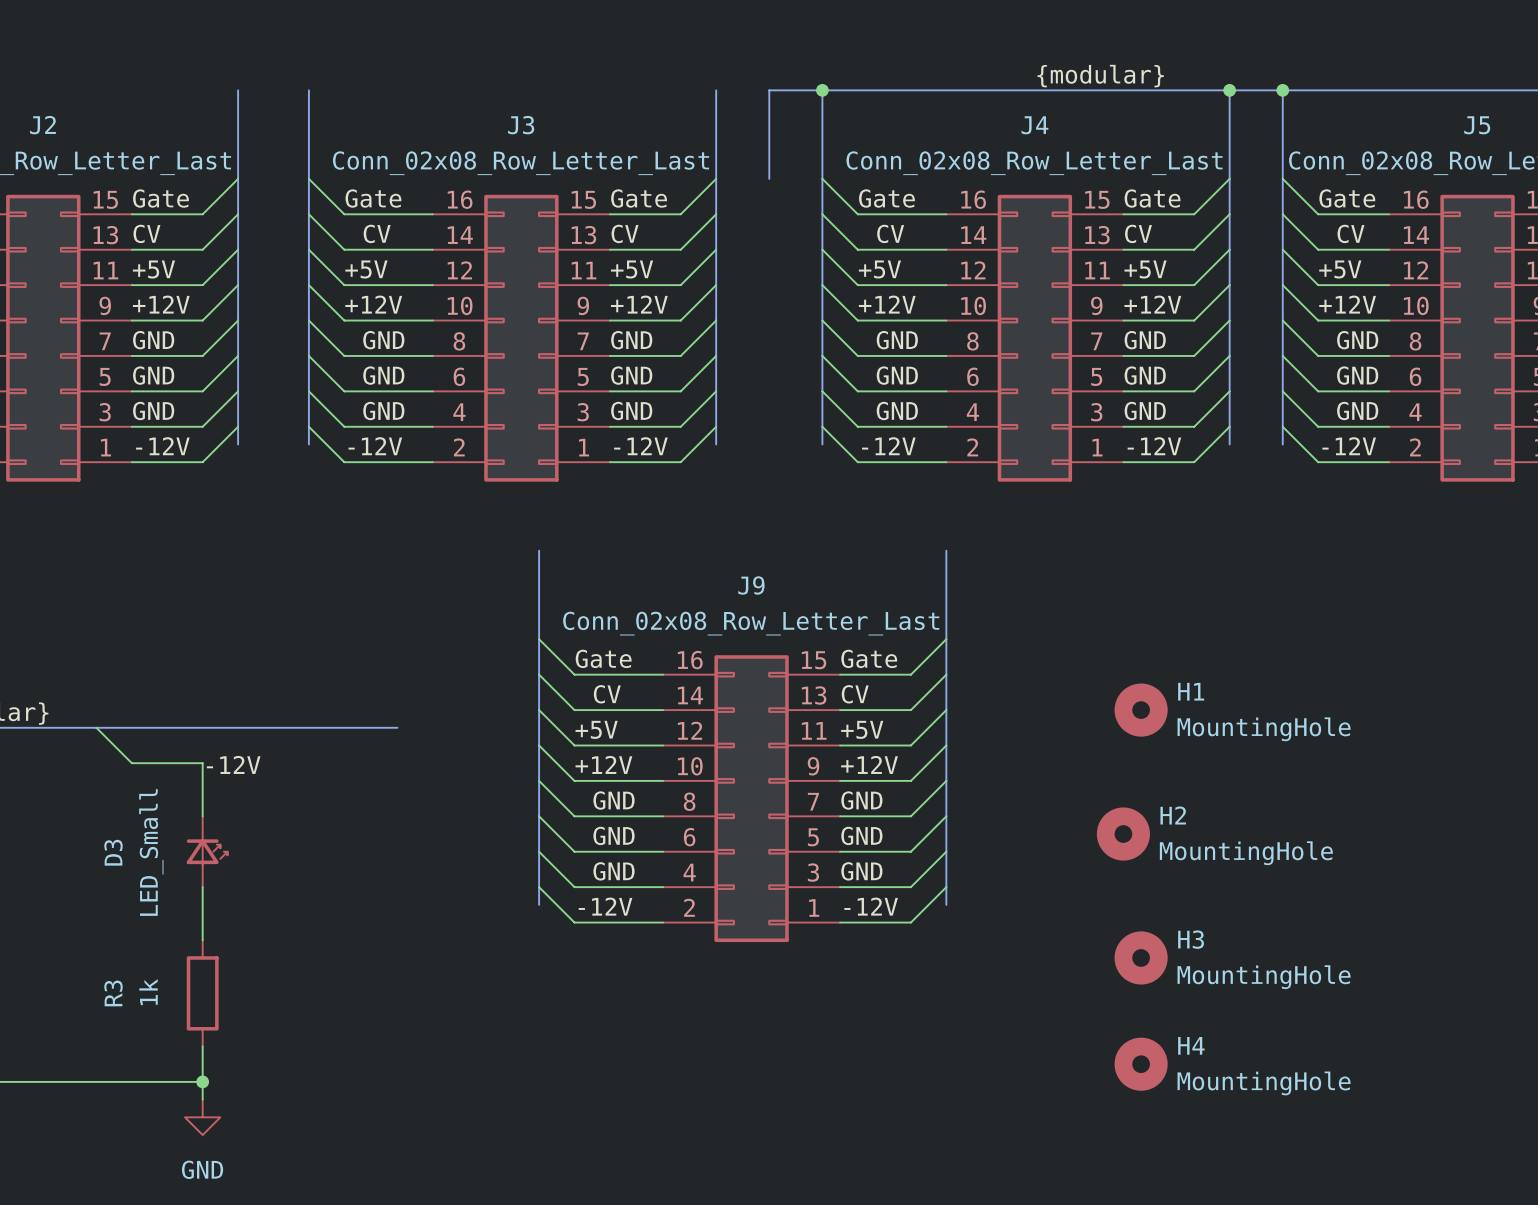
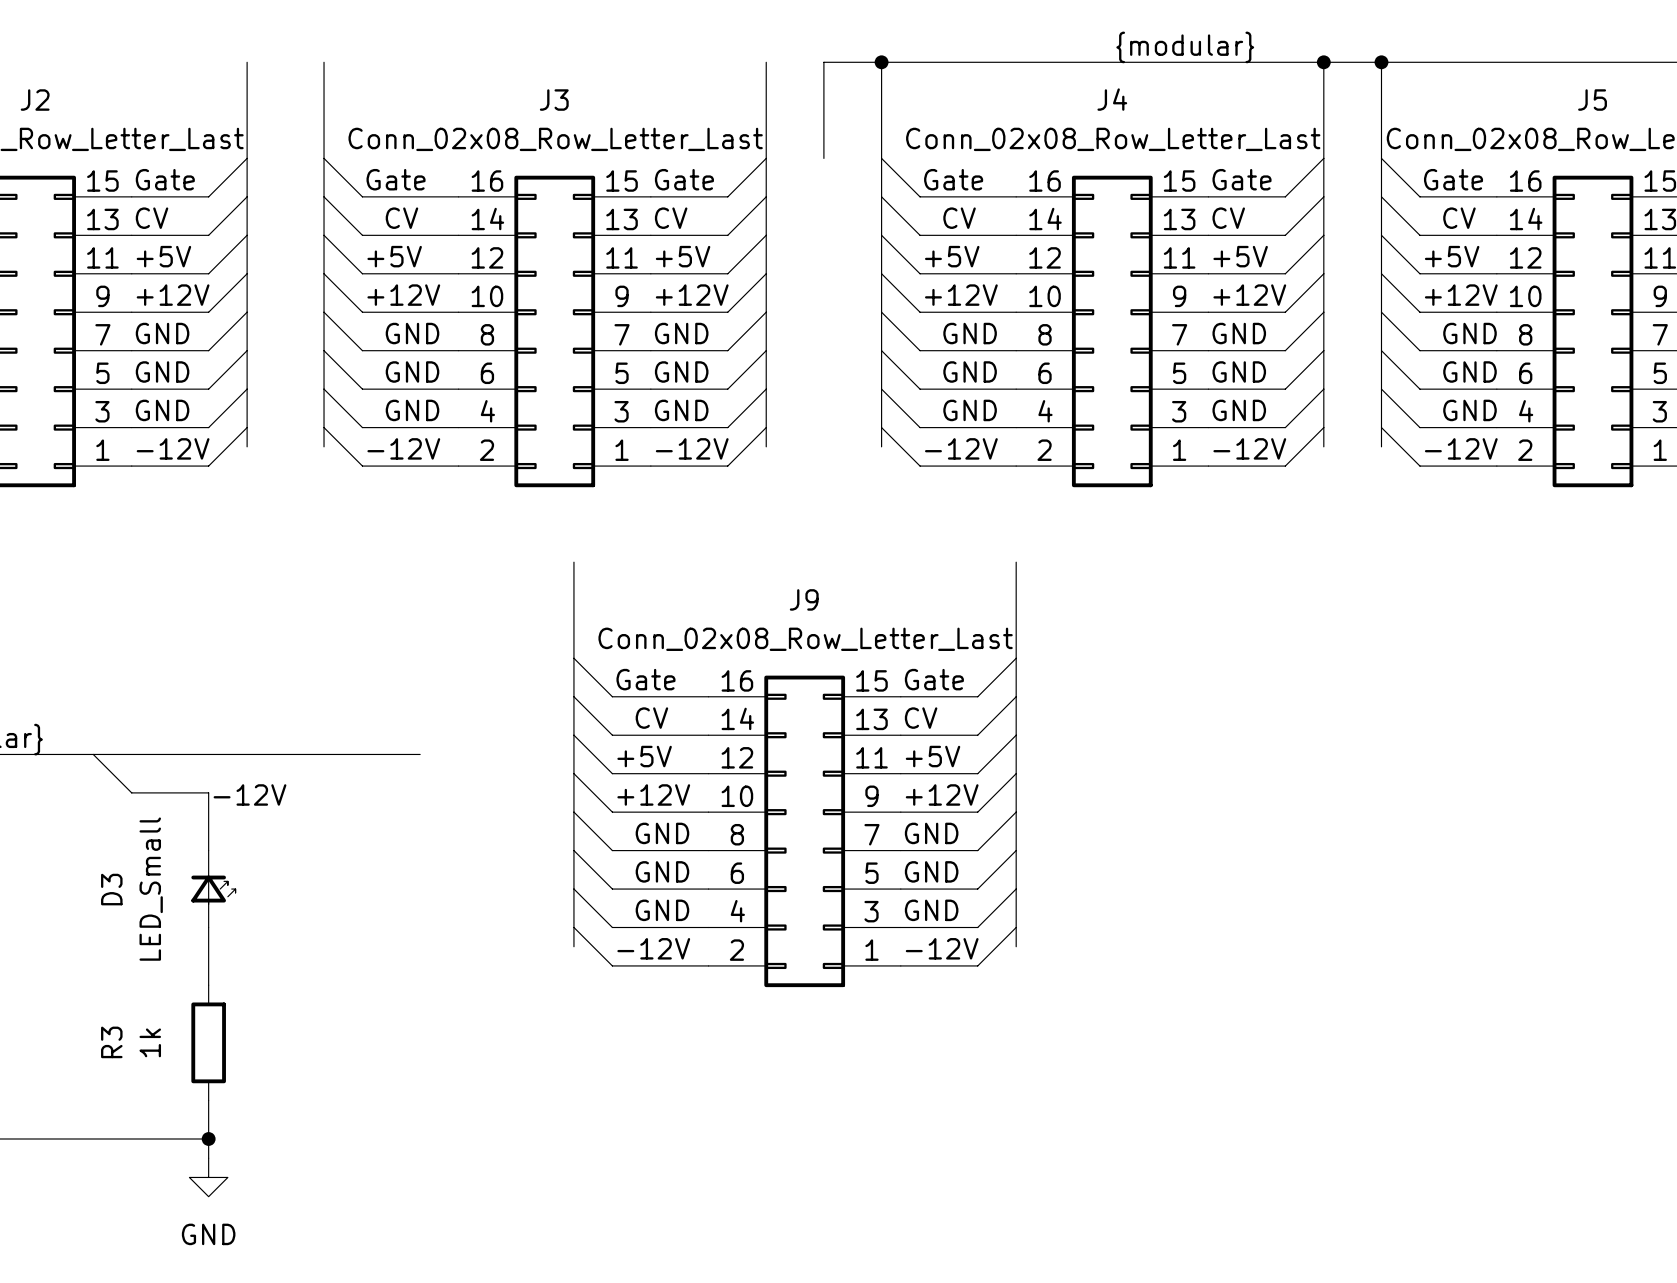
H1: MountingHole (1141, 710) -> none
H2: MountingHole (1123, 834) -> none
H3: MountingHole (1141, 957) -> none
H4: MountingHole (1141, 1064) -> none

